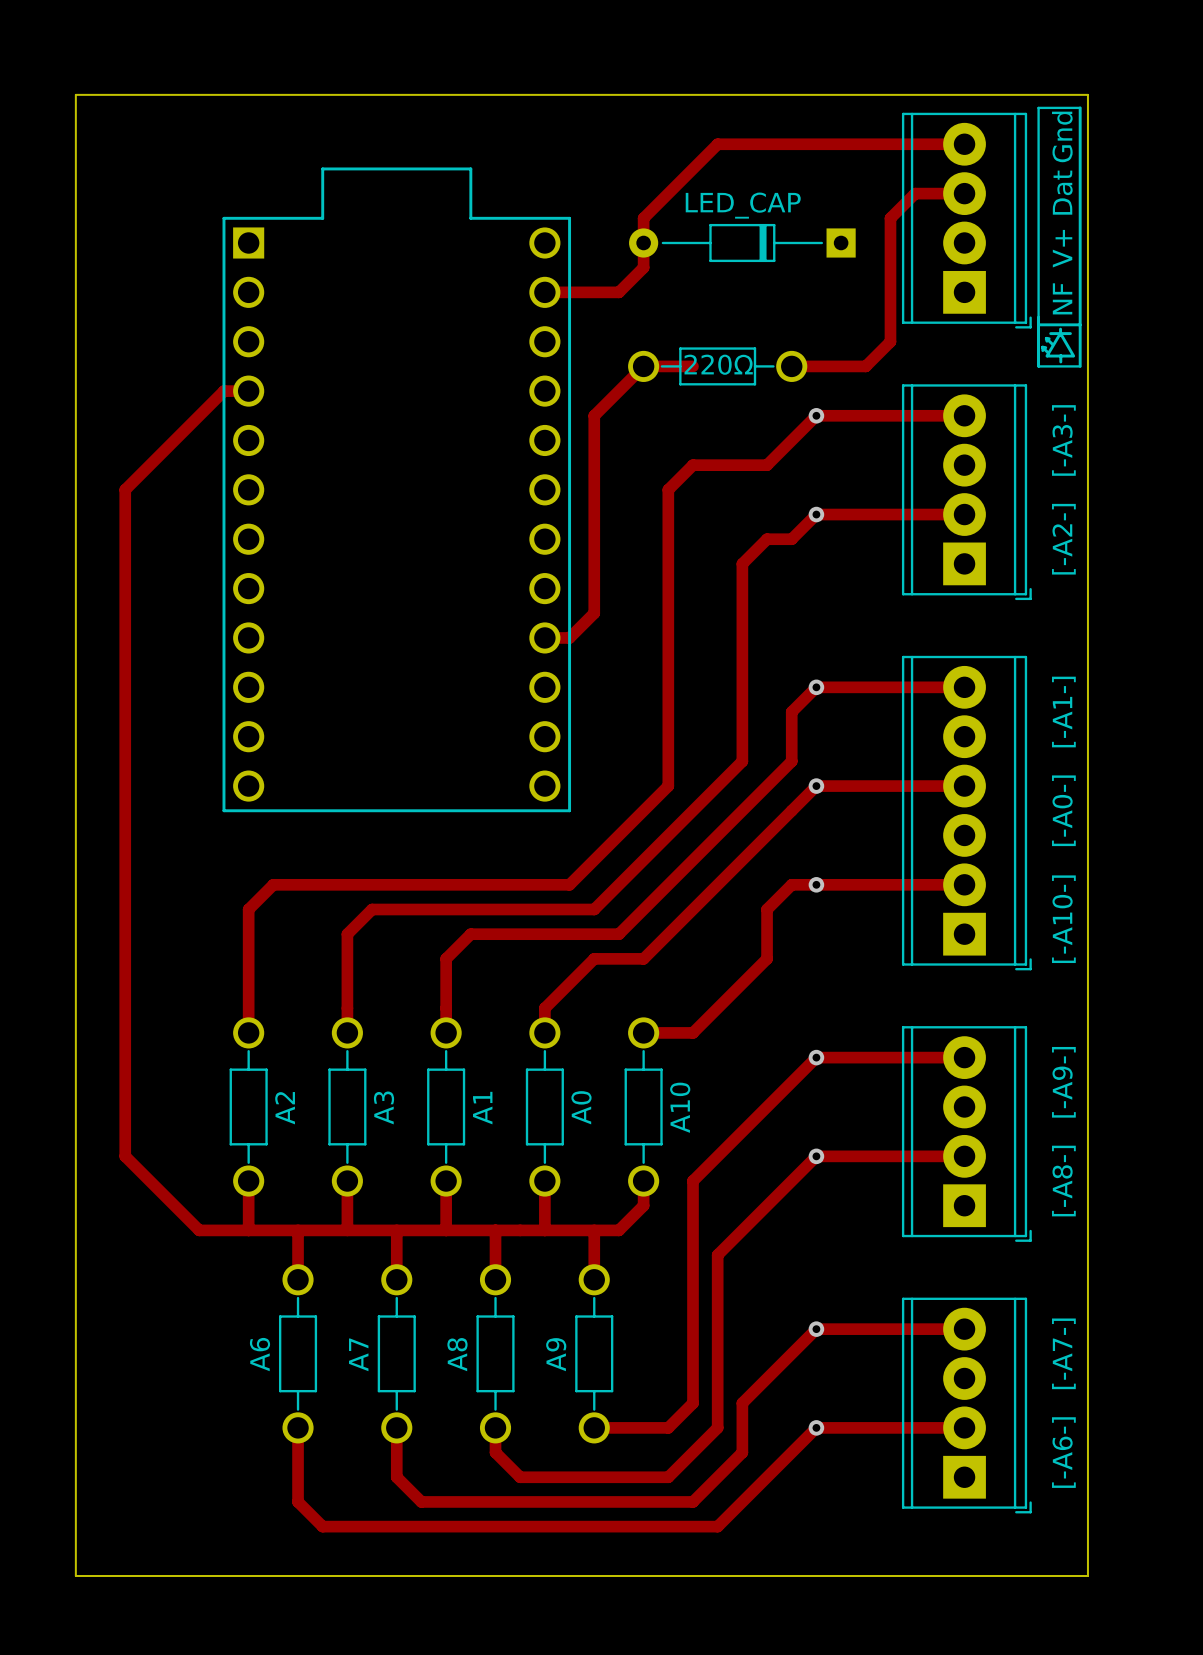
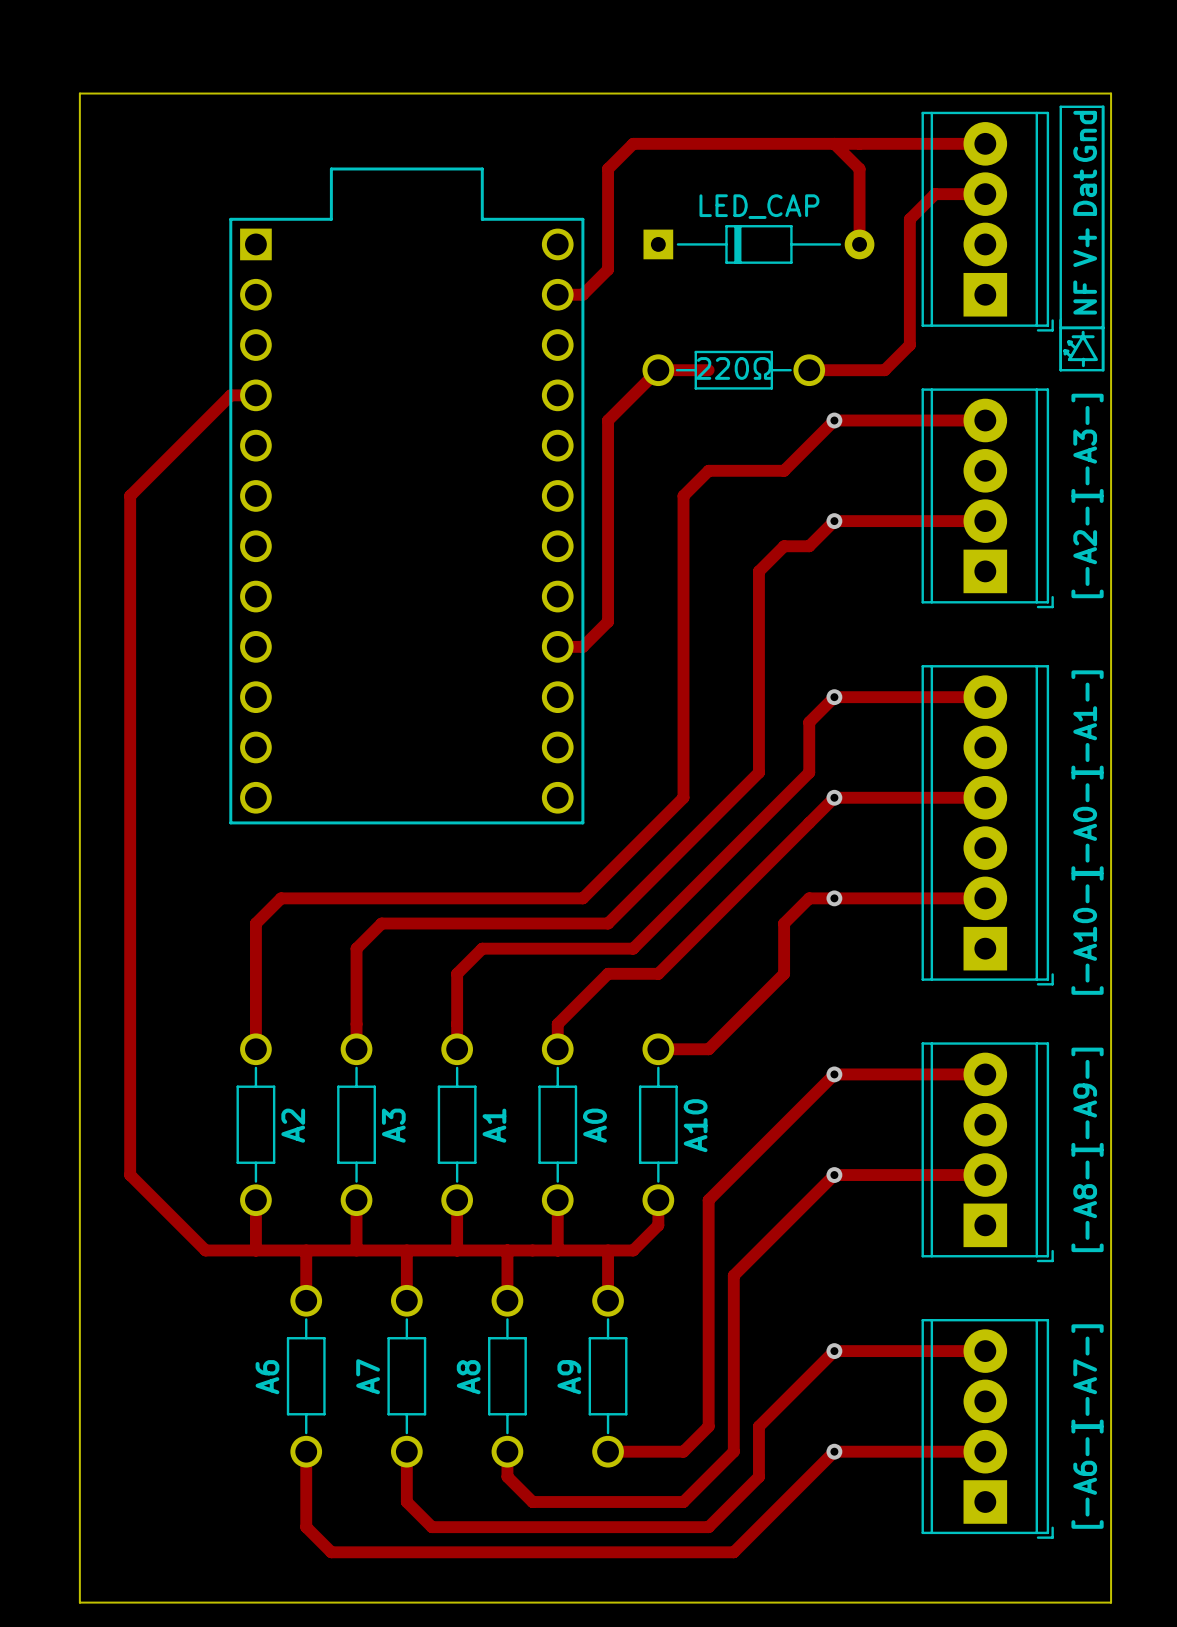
track: (717, 144) (643, 218) (643, 267) (618, 292) (569, 292) -> (733, 143) (633, 143) (608, 168) (608, 269) (582, 294)
track: none -> (834, 143) (859, 168) (859, 244)
LED_CAP rotation: 0° (742, 242) -> 180° (758, 244)

